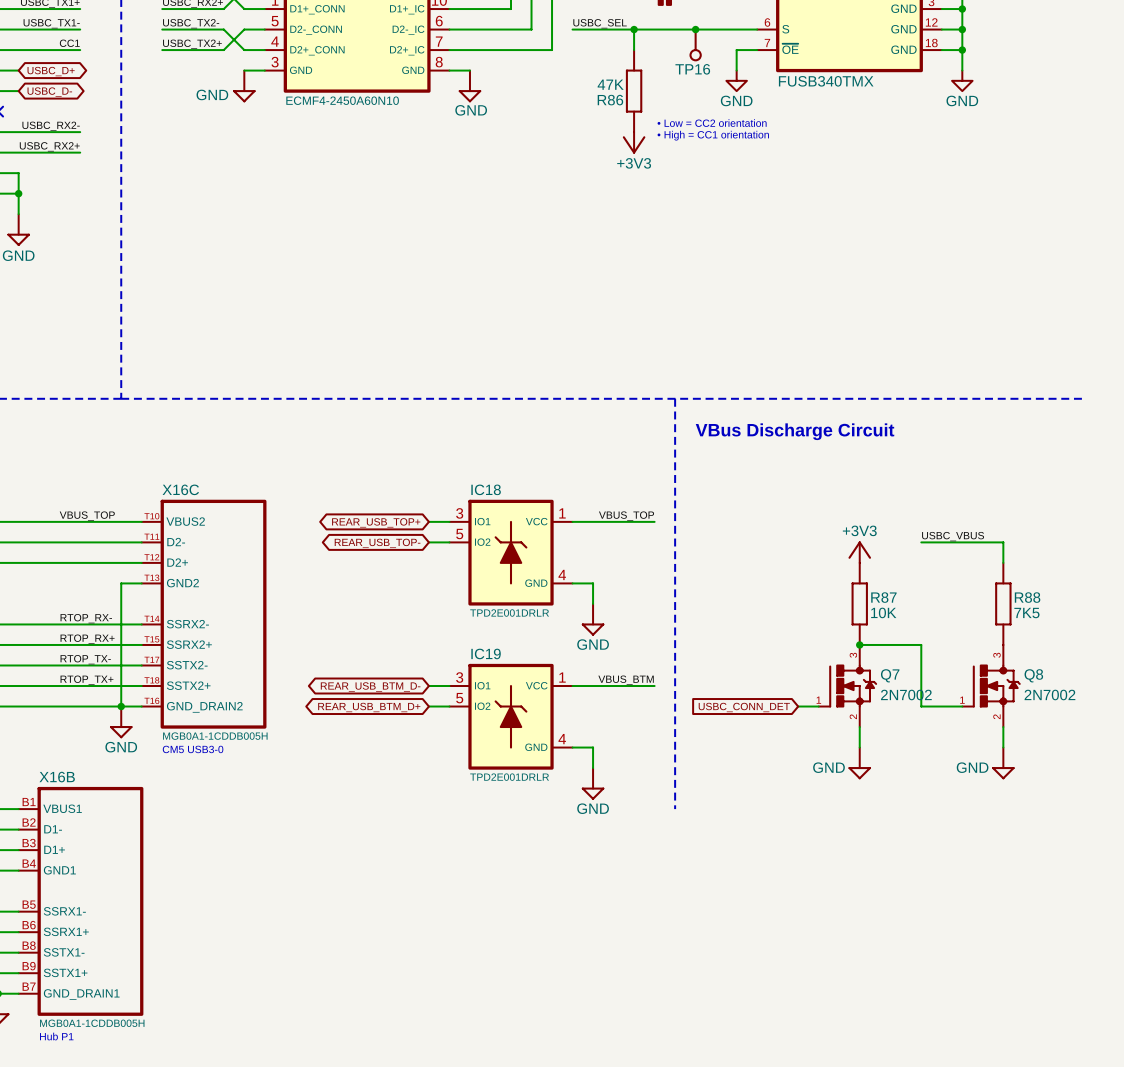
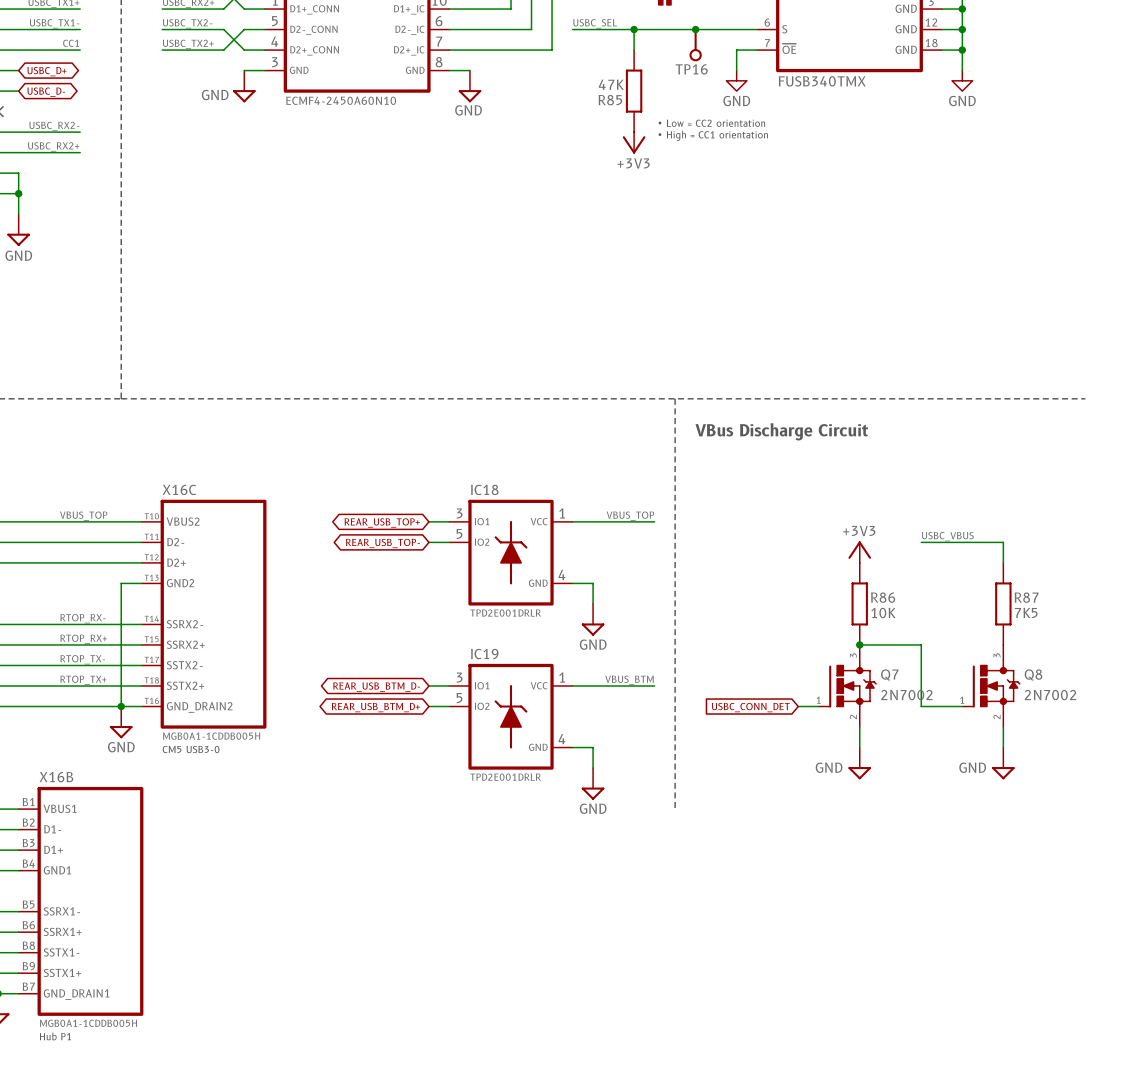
R86 name: R86 (610, 100) -> R85 (610, 100)
R87 name: R87 (883, 597) -> R86 (883, 597)
R88 name: R88 (1027, 597) -> R87 (1026, 597)

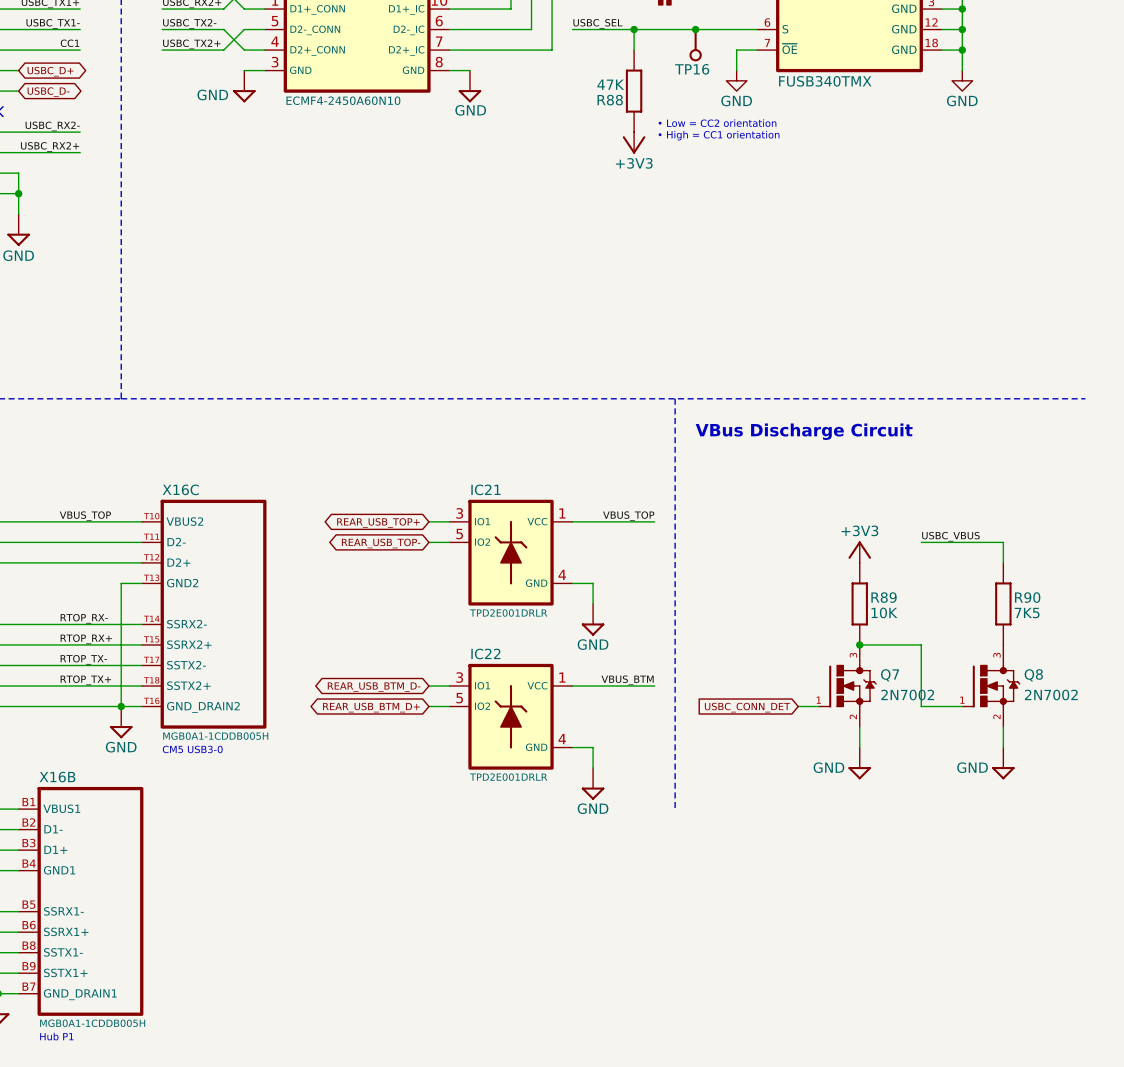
R85 name: R85 (610, 100) -> R88 (610, 100)
IC18 name: IC18 (484, 489) -> IC21 (485, 489)
R86 name: R86 (883, 597) -> R89 (884, 597)
R87 name: R87 (1026, 597) -> R90 (1027, 597)
IC19 name: IC19 (484, 654) -> IC22 (485, 653)

